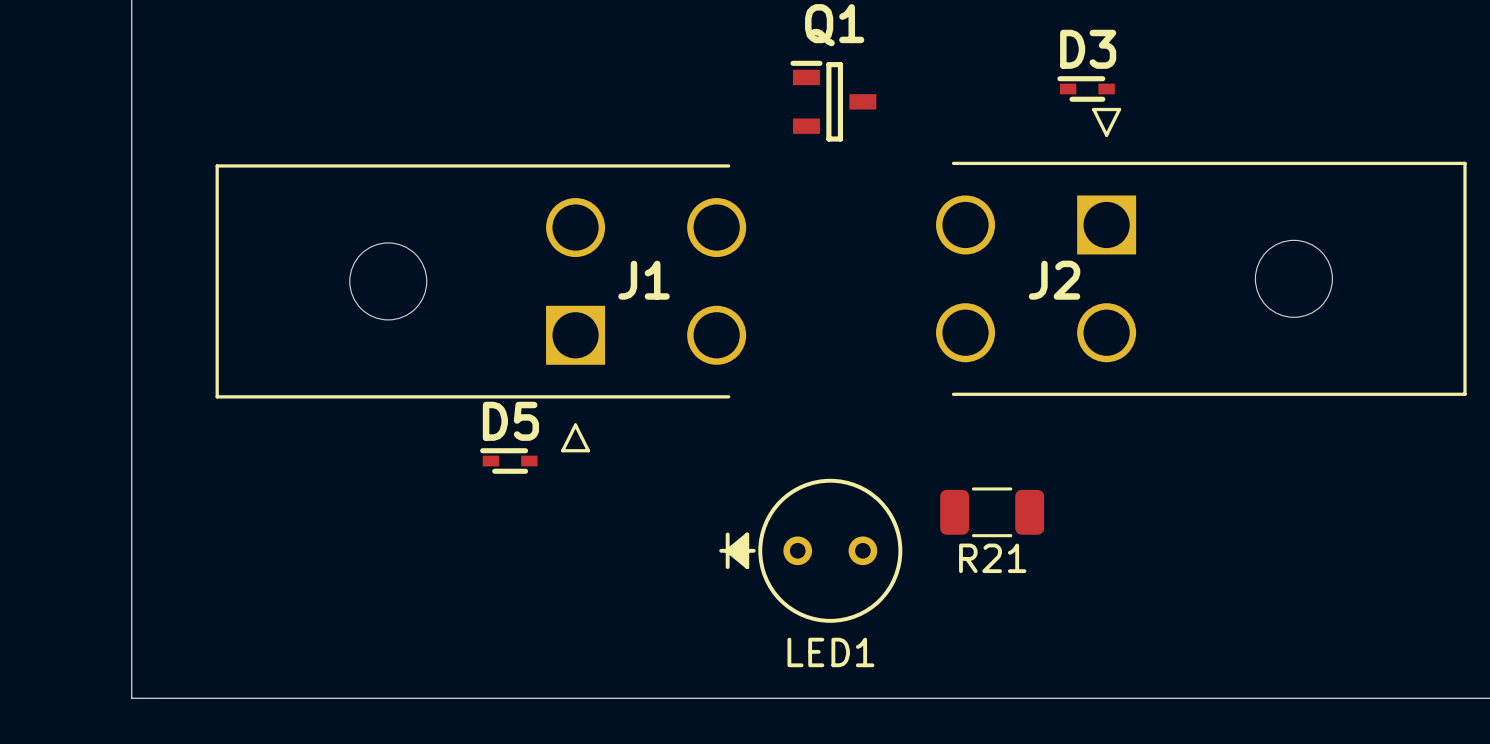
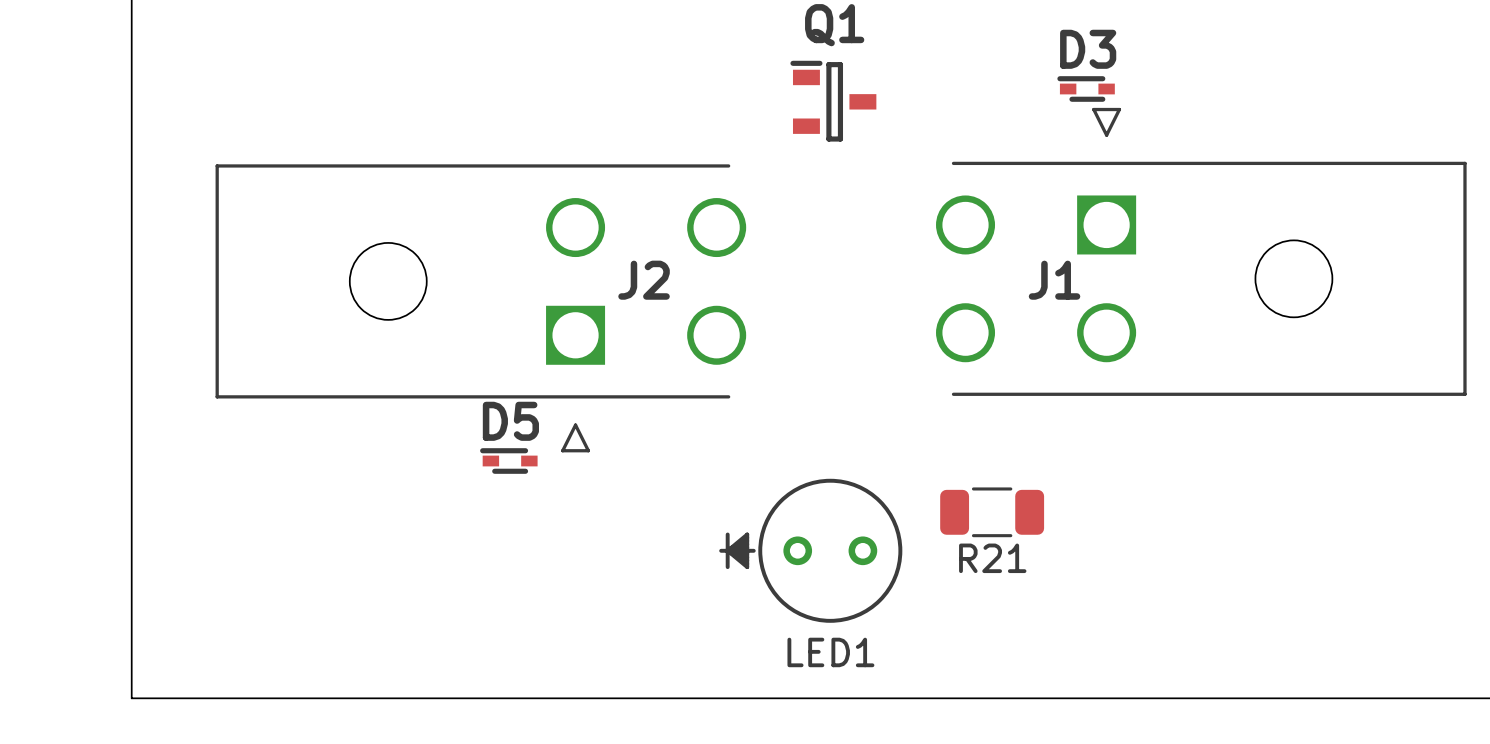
J1 name: J1 (644, 280) -> J2 (644, 280)
J2 name: J2 (1054, 280) -> J1 (1054, 280)

